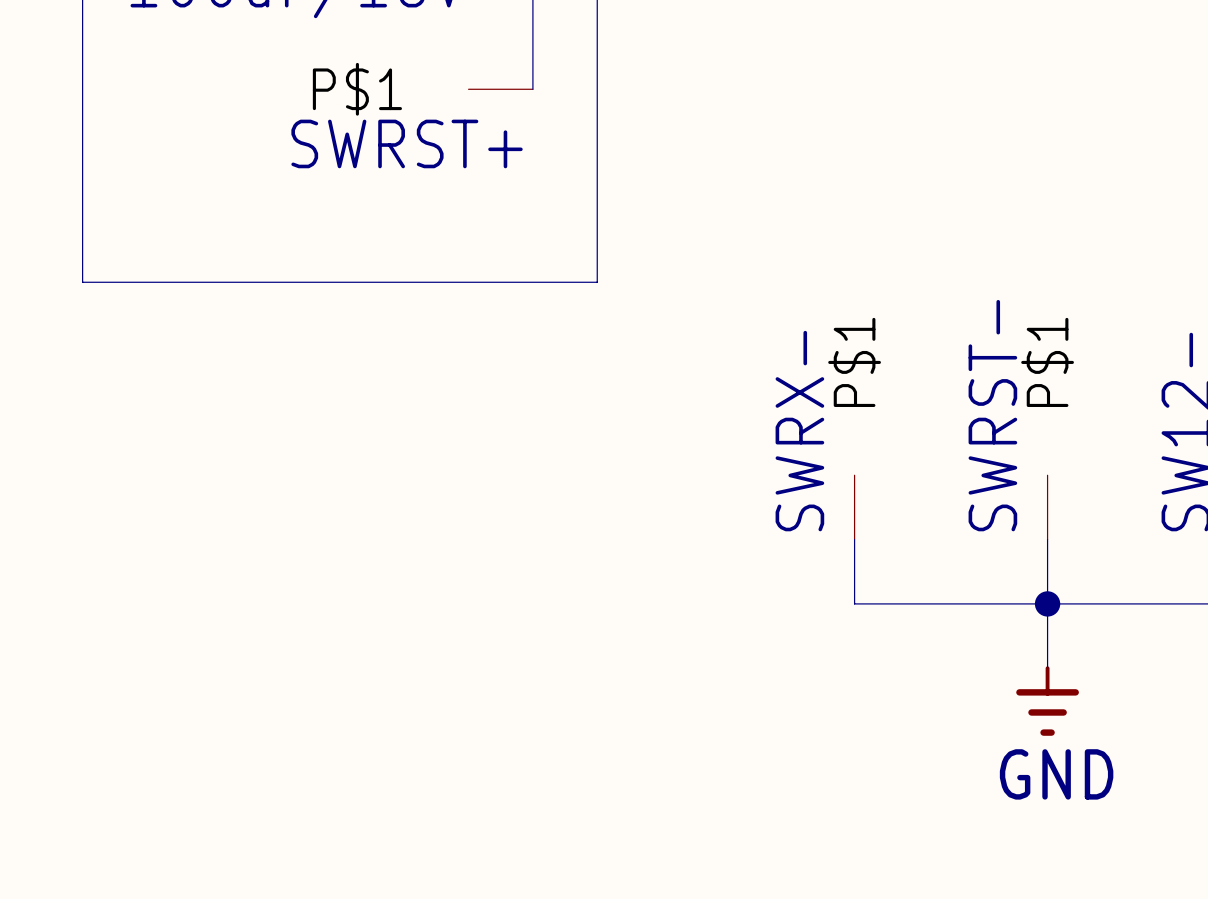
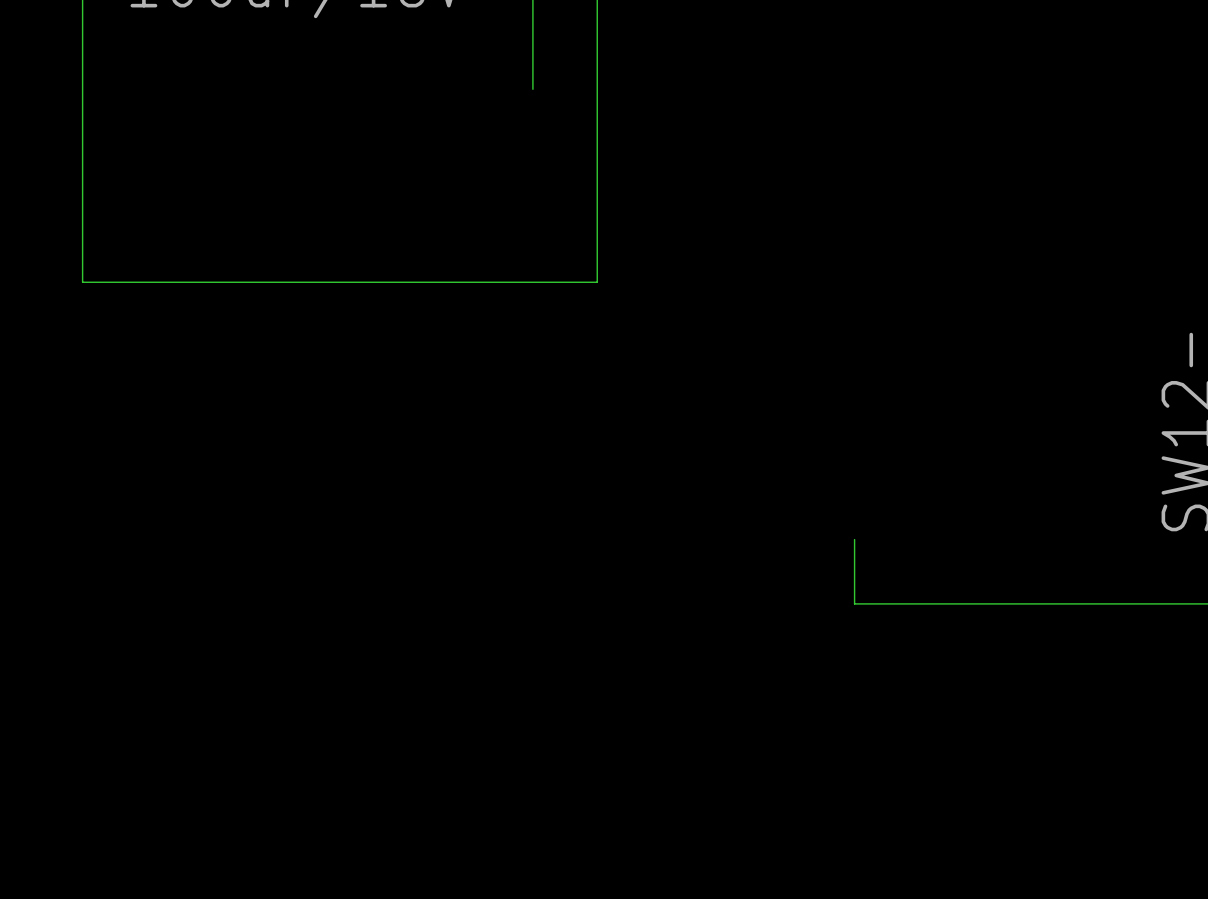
SWRST+: (500, 89) -> none
SWRX-: (854, 507) -> none
SWRST-: (1047, 507) -> none
wire: (1047, 539) (1047, 668) -> none
junction: (1047, 603) -> none
power symbol: GND (1047, 701) -> none

